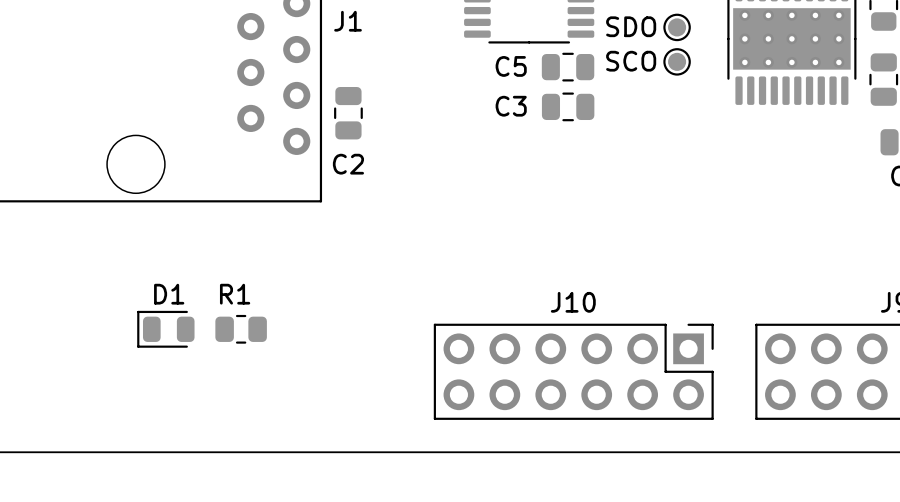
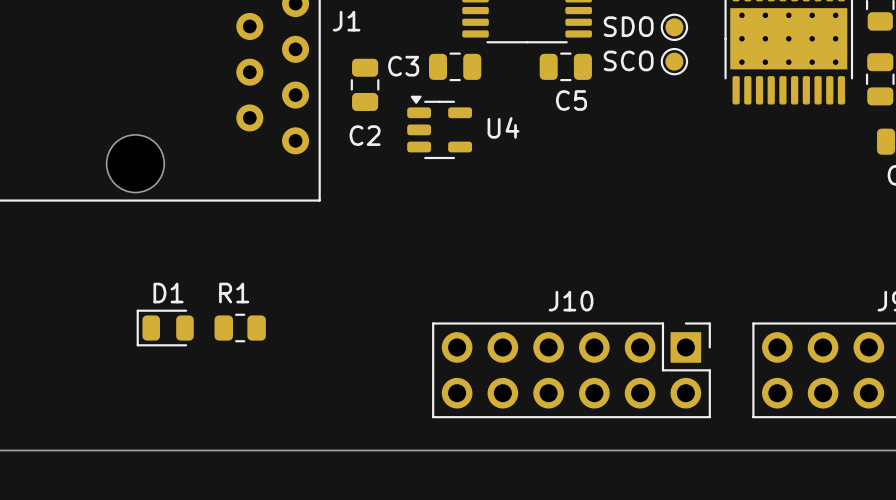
C5 name position: C5 (511, 66) -> C5 (571, 100)
C3 name position: C3 (511, 106) -> C3 (403, 66)
C3 position: (568, 106) -> (455, 66)
C2 position: (348, 113) -> (365, 84)
U4: none -> (439, 127)

